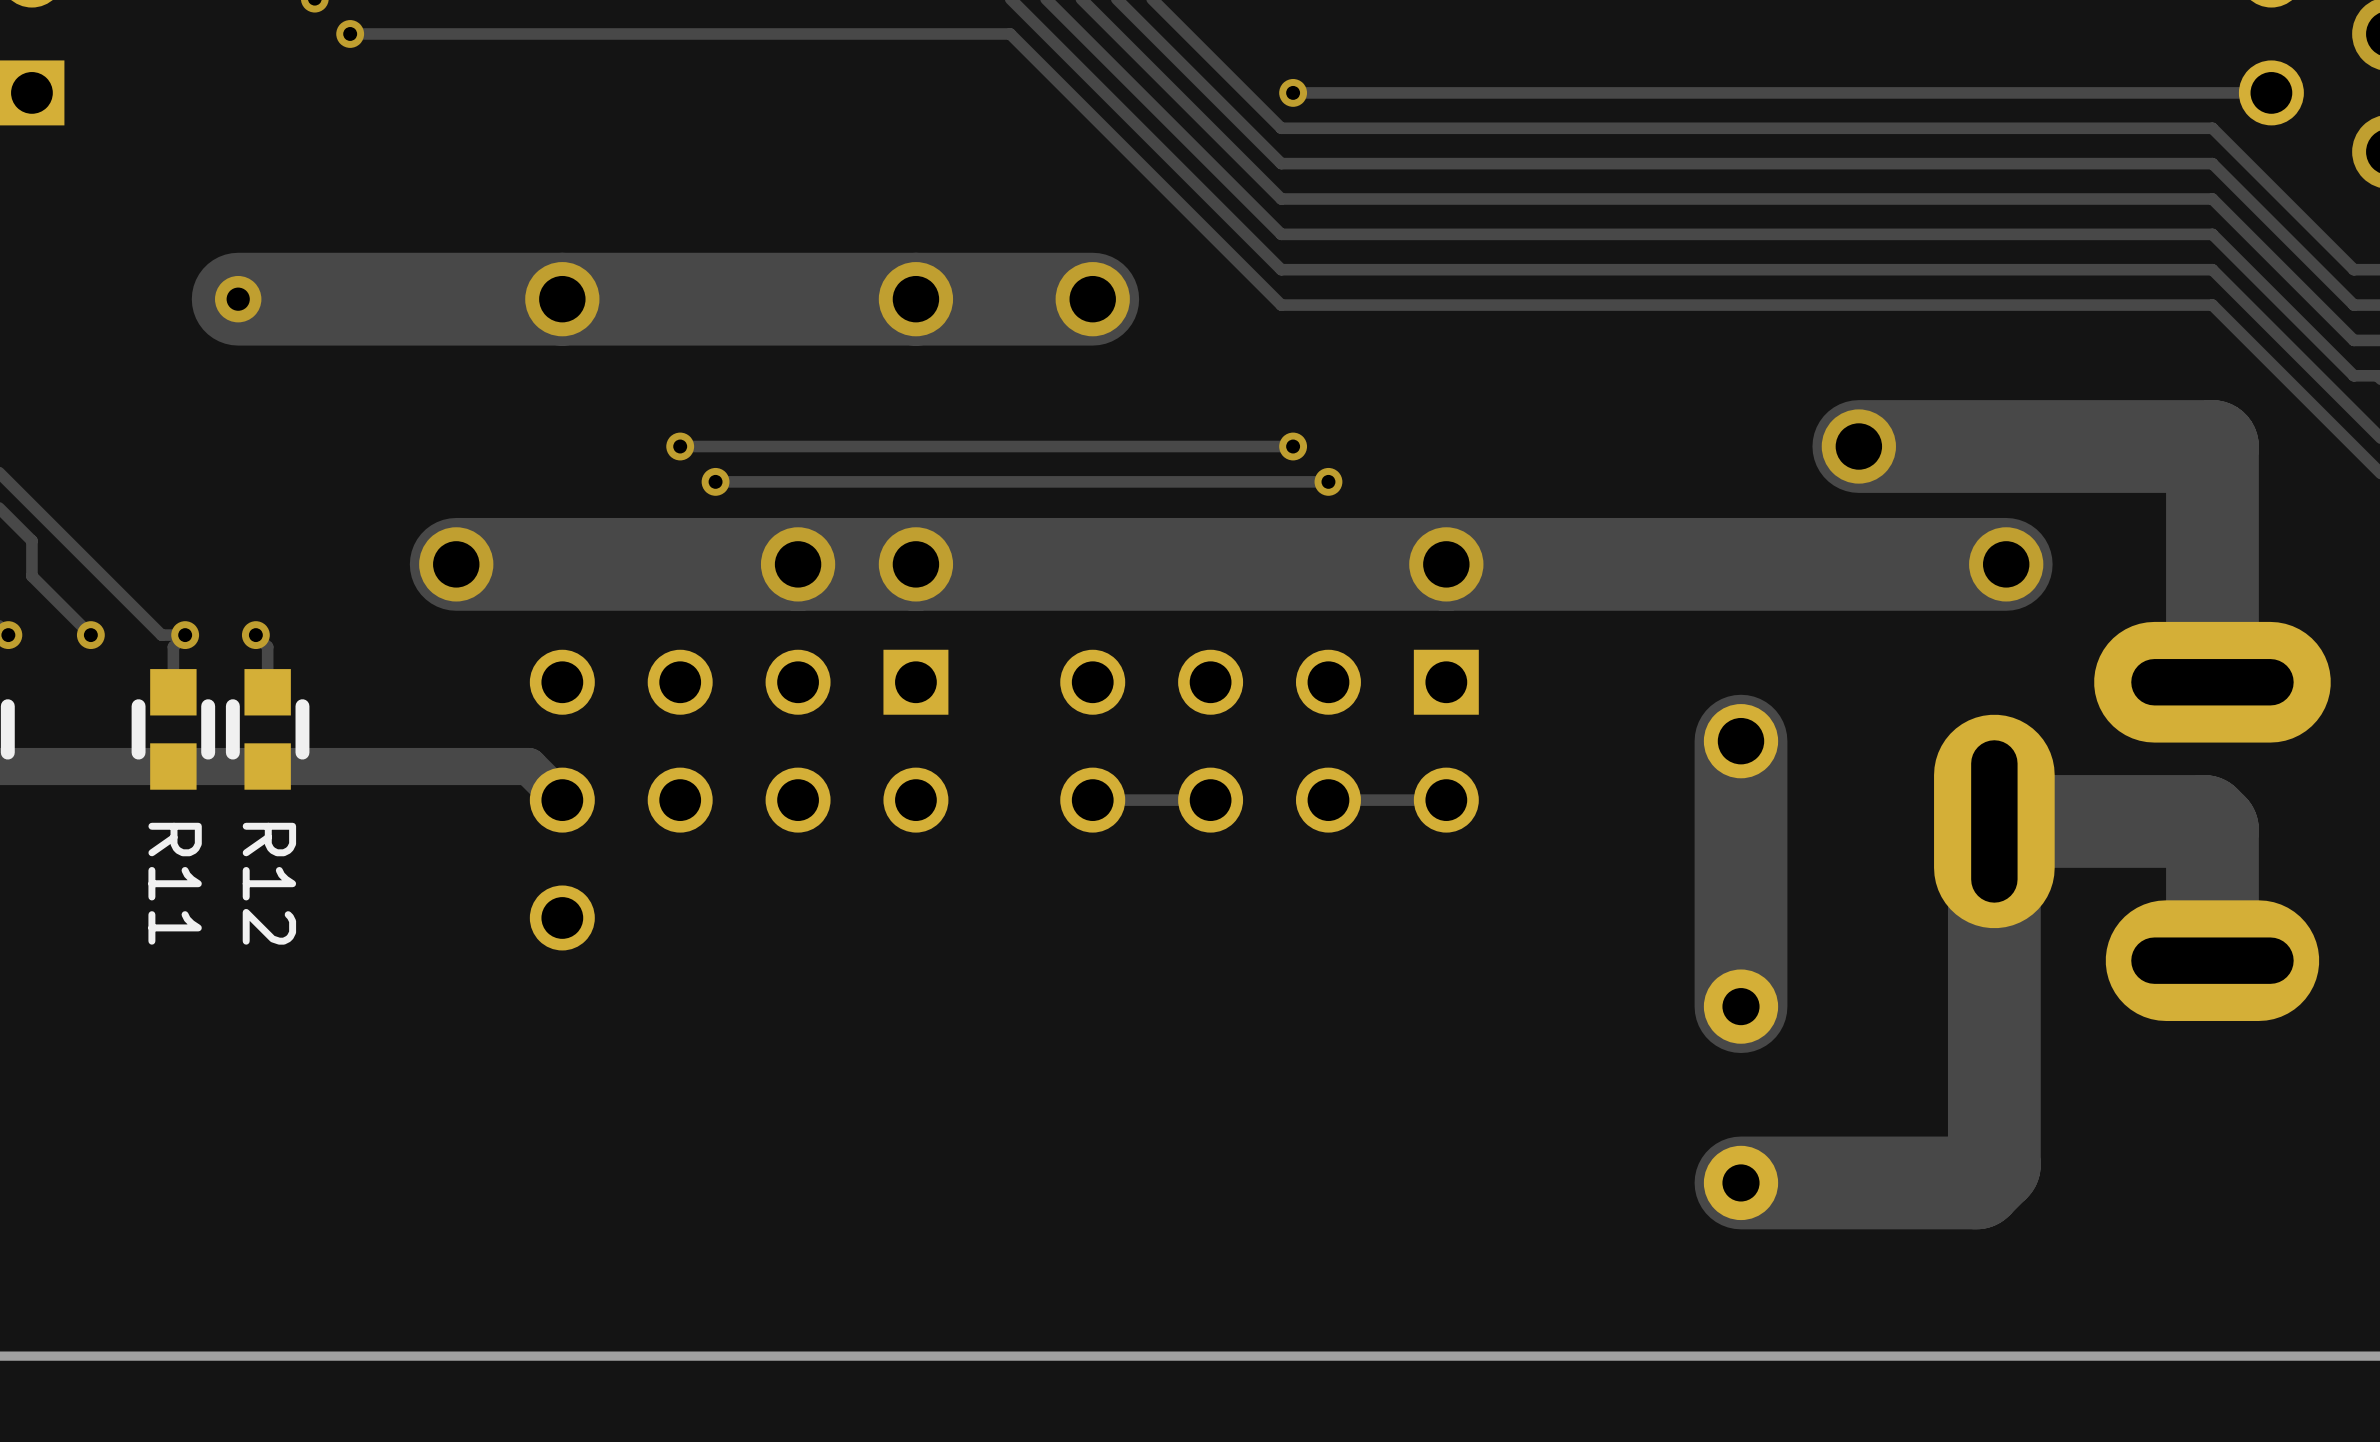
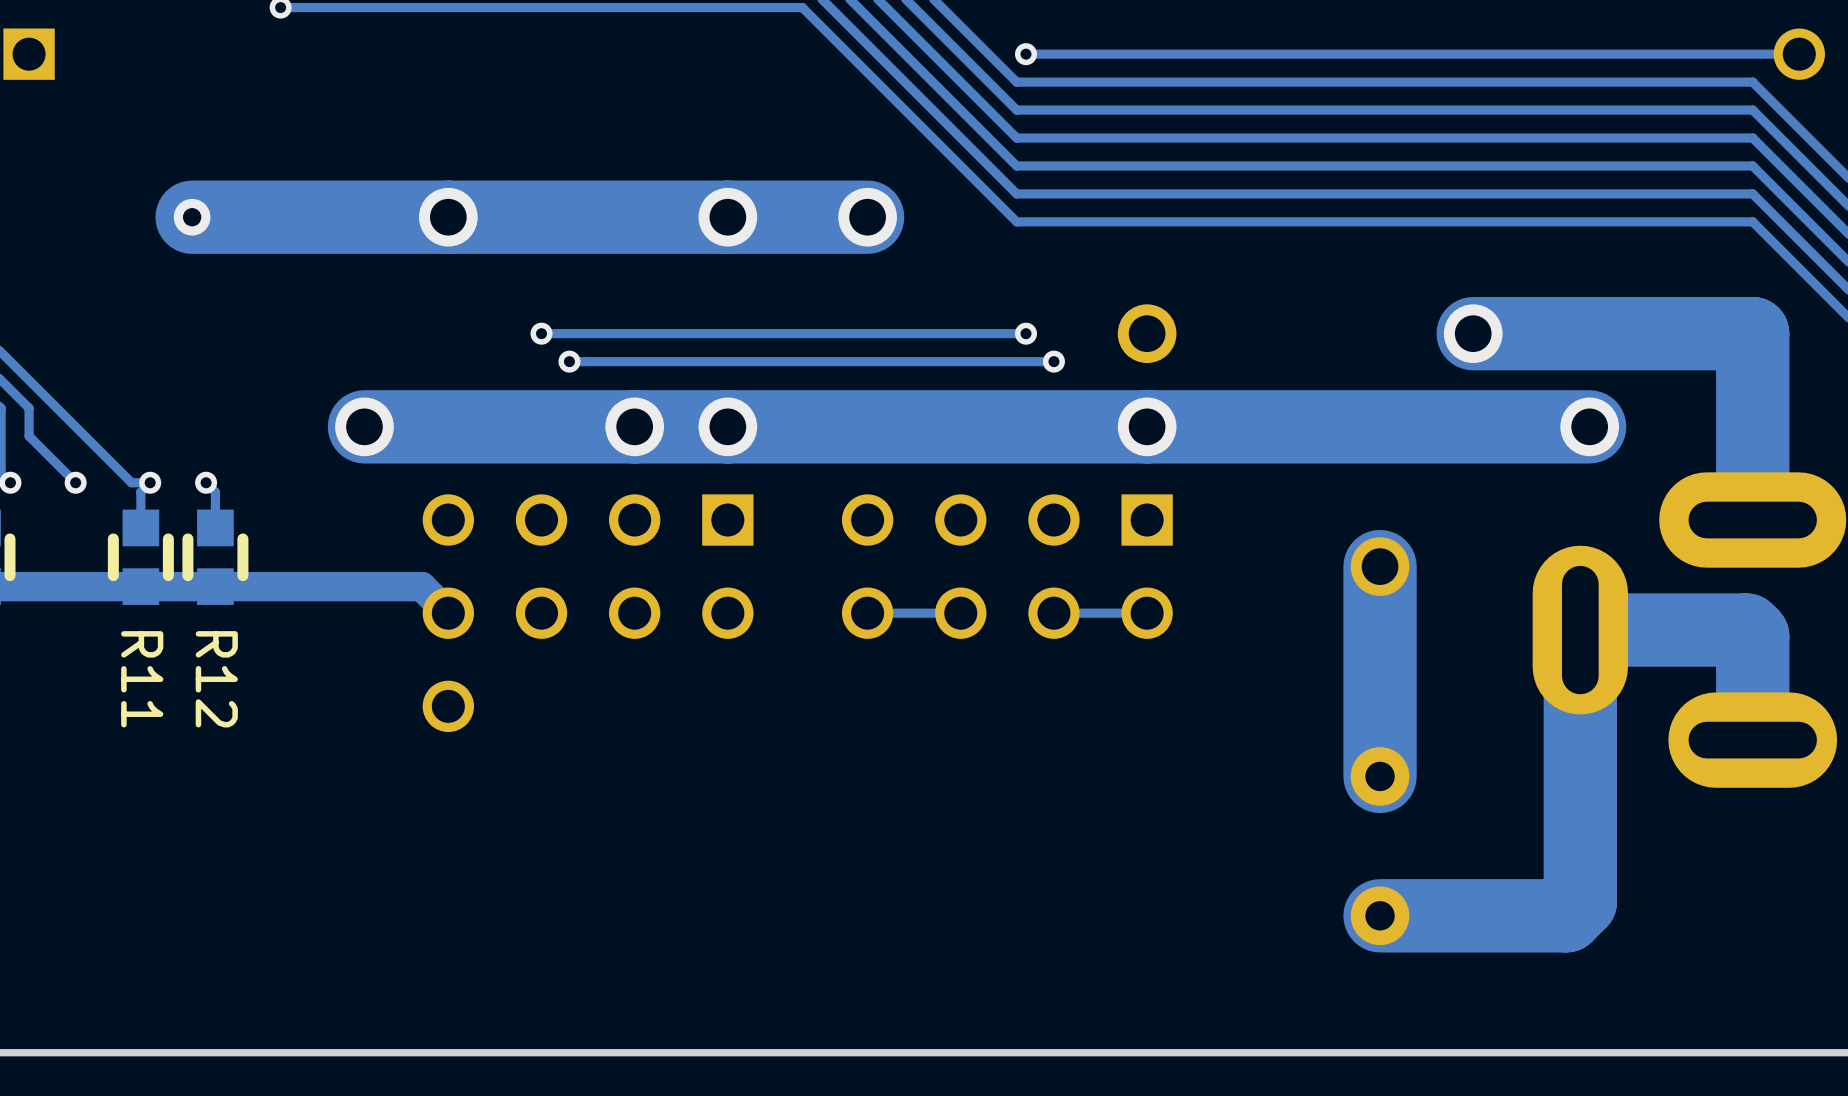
part: none -> (1147, 333)

